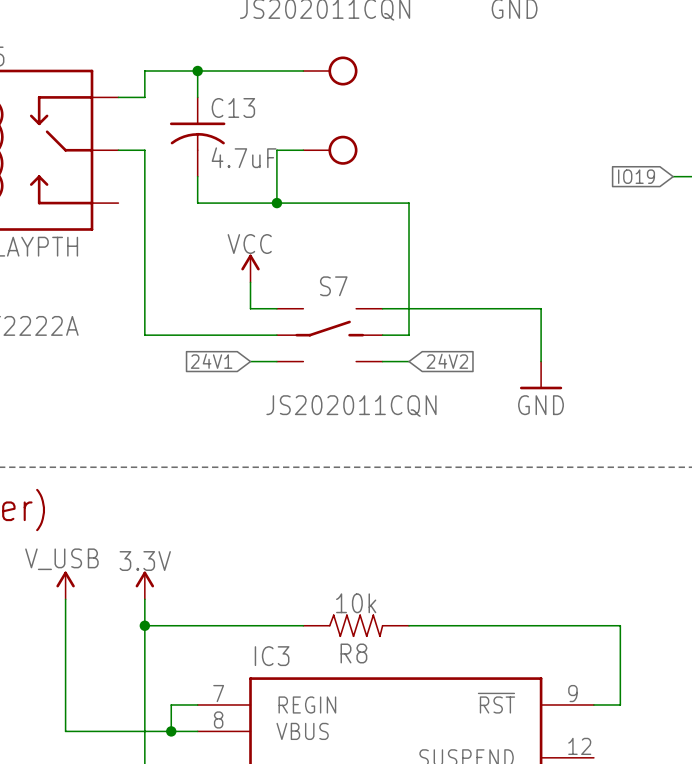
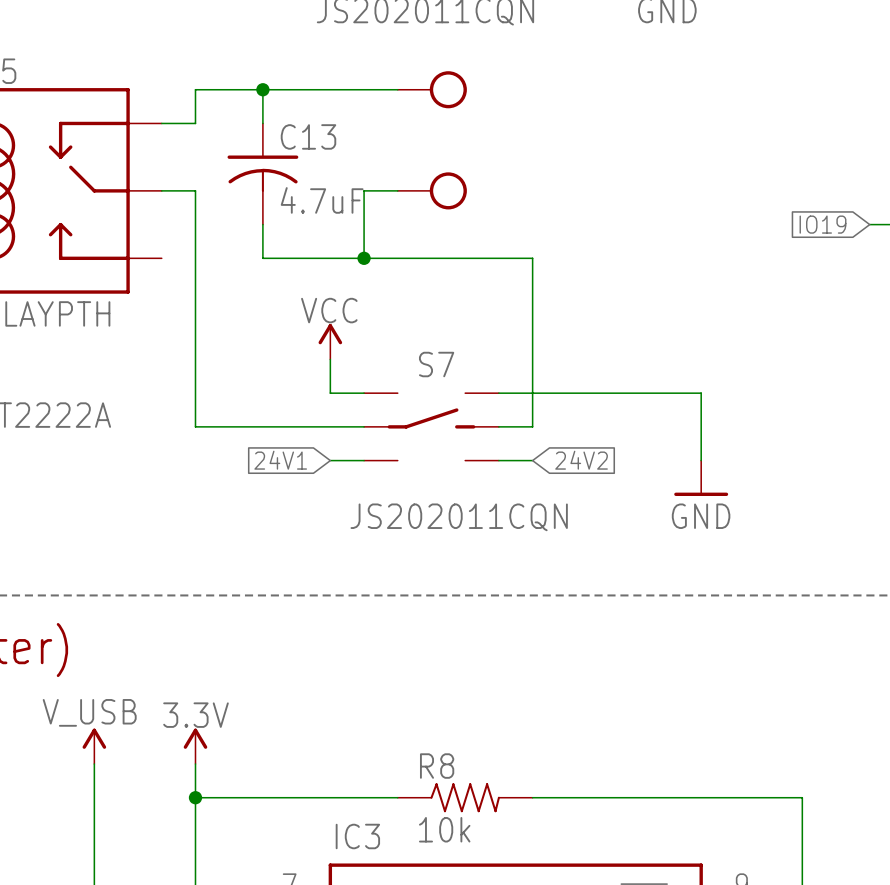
R8 value position: 10k (356, 603) -> 10k (444, 829)
R8 name position: R8 (353, 653) -> R8 (437, 766)

